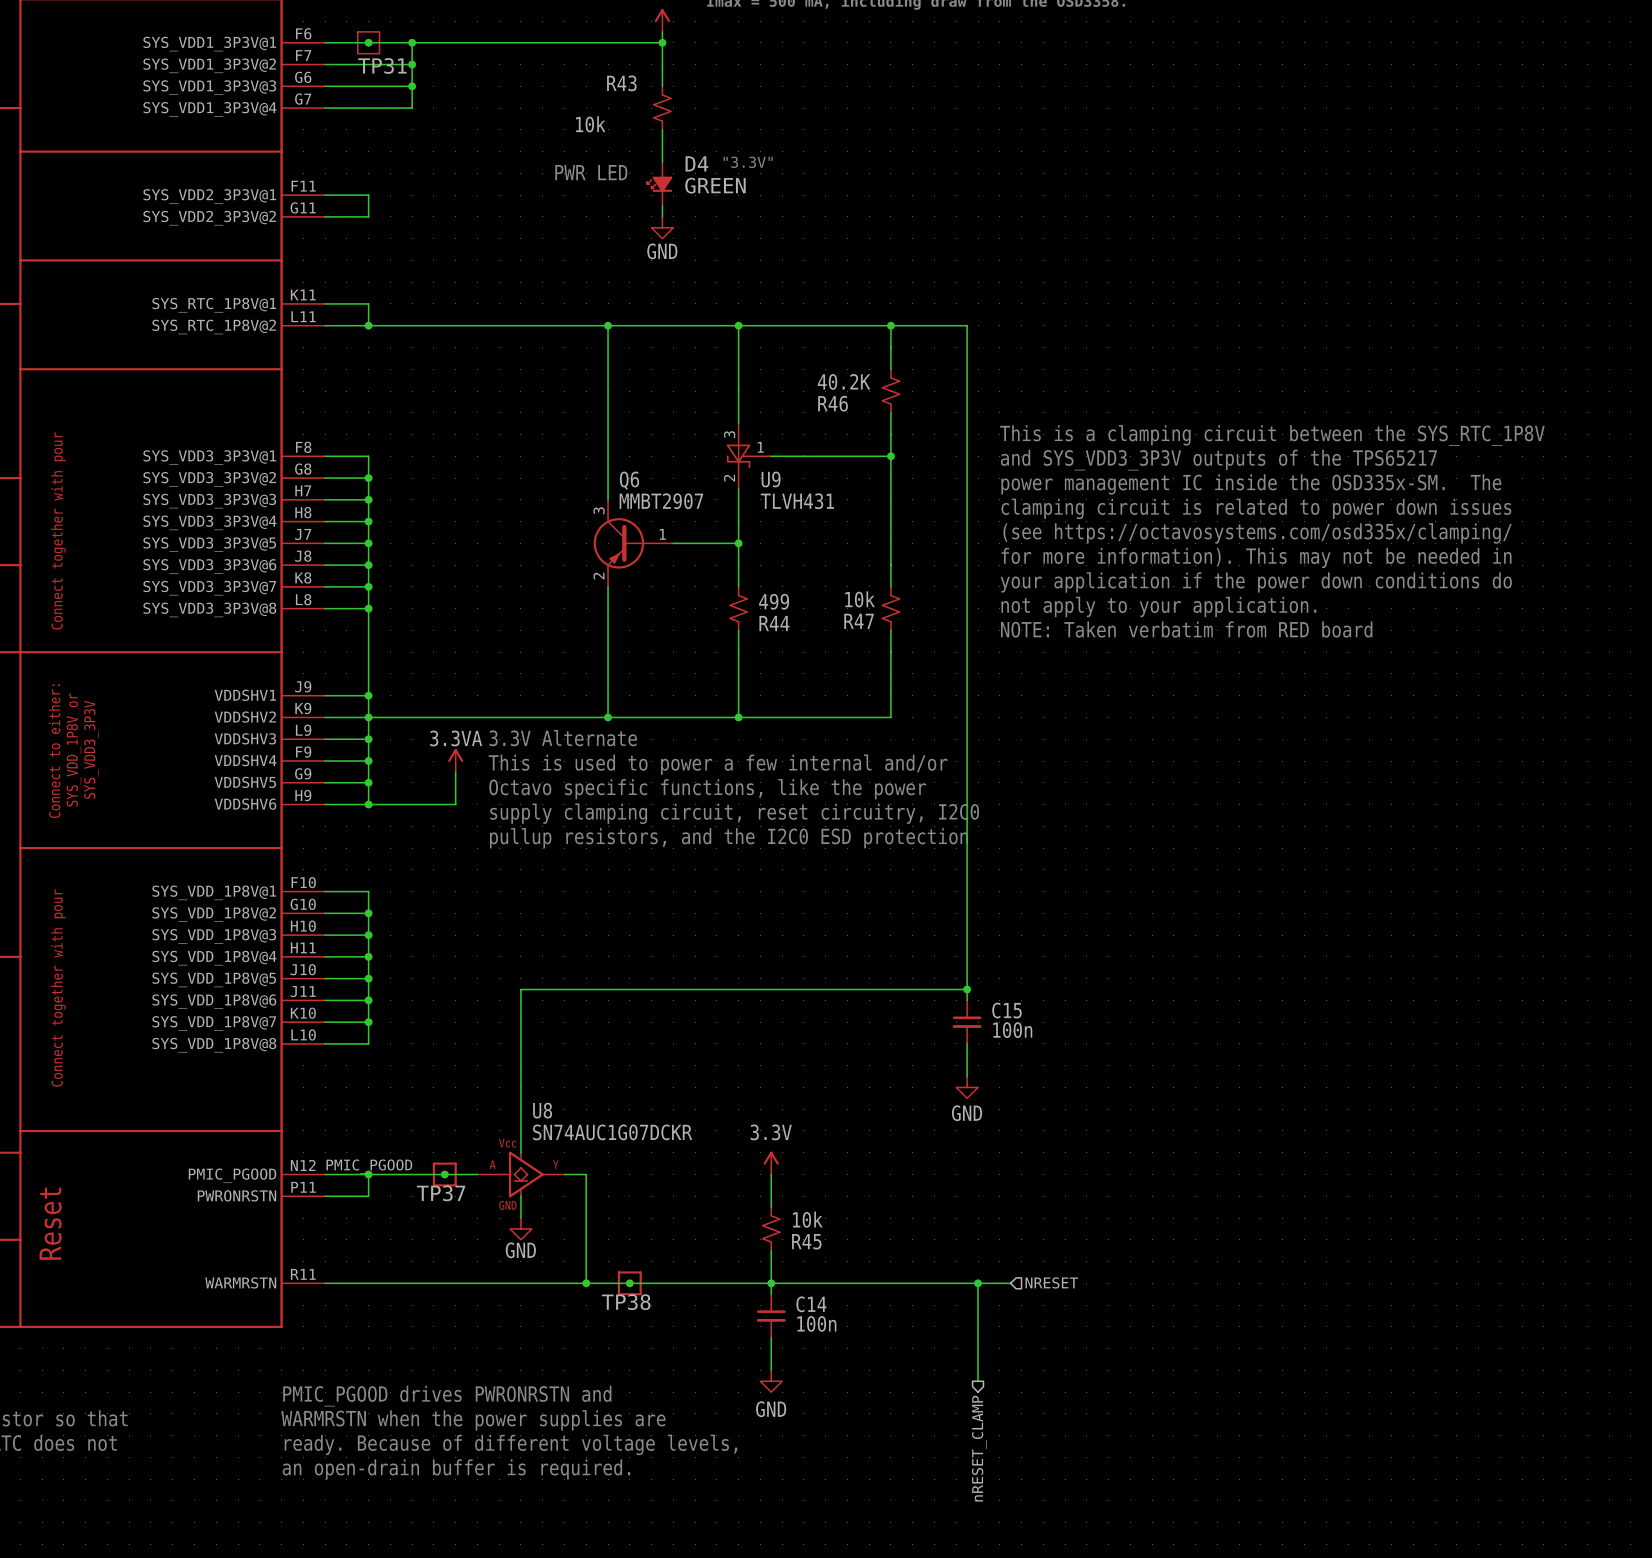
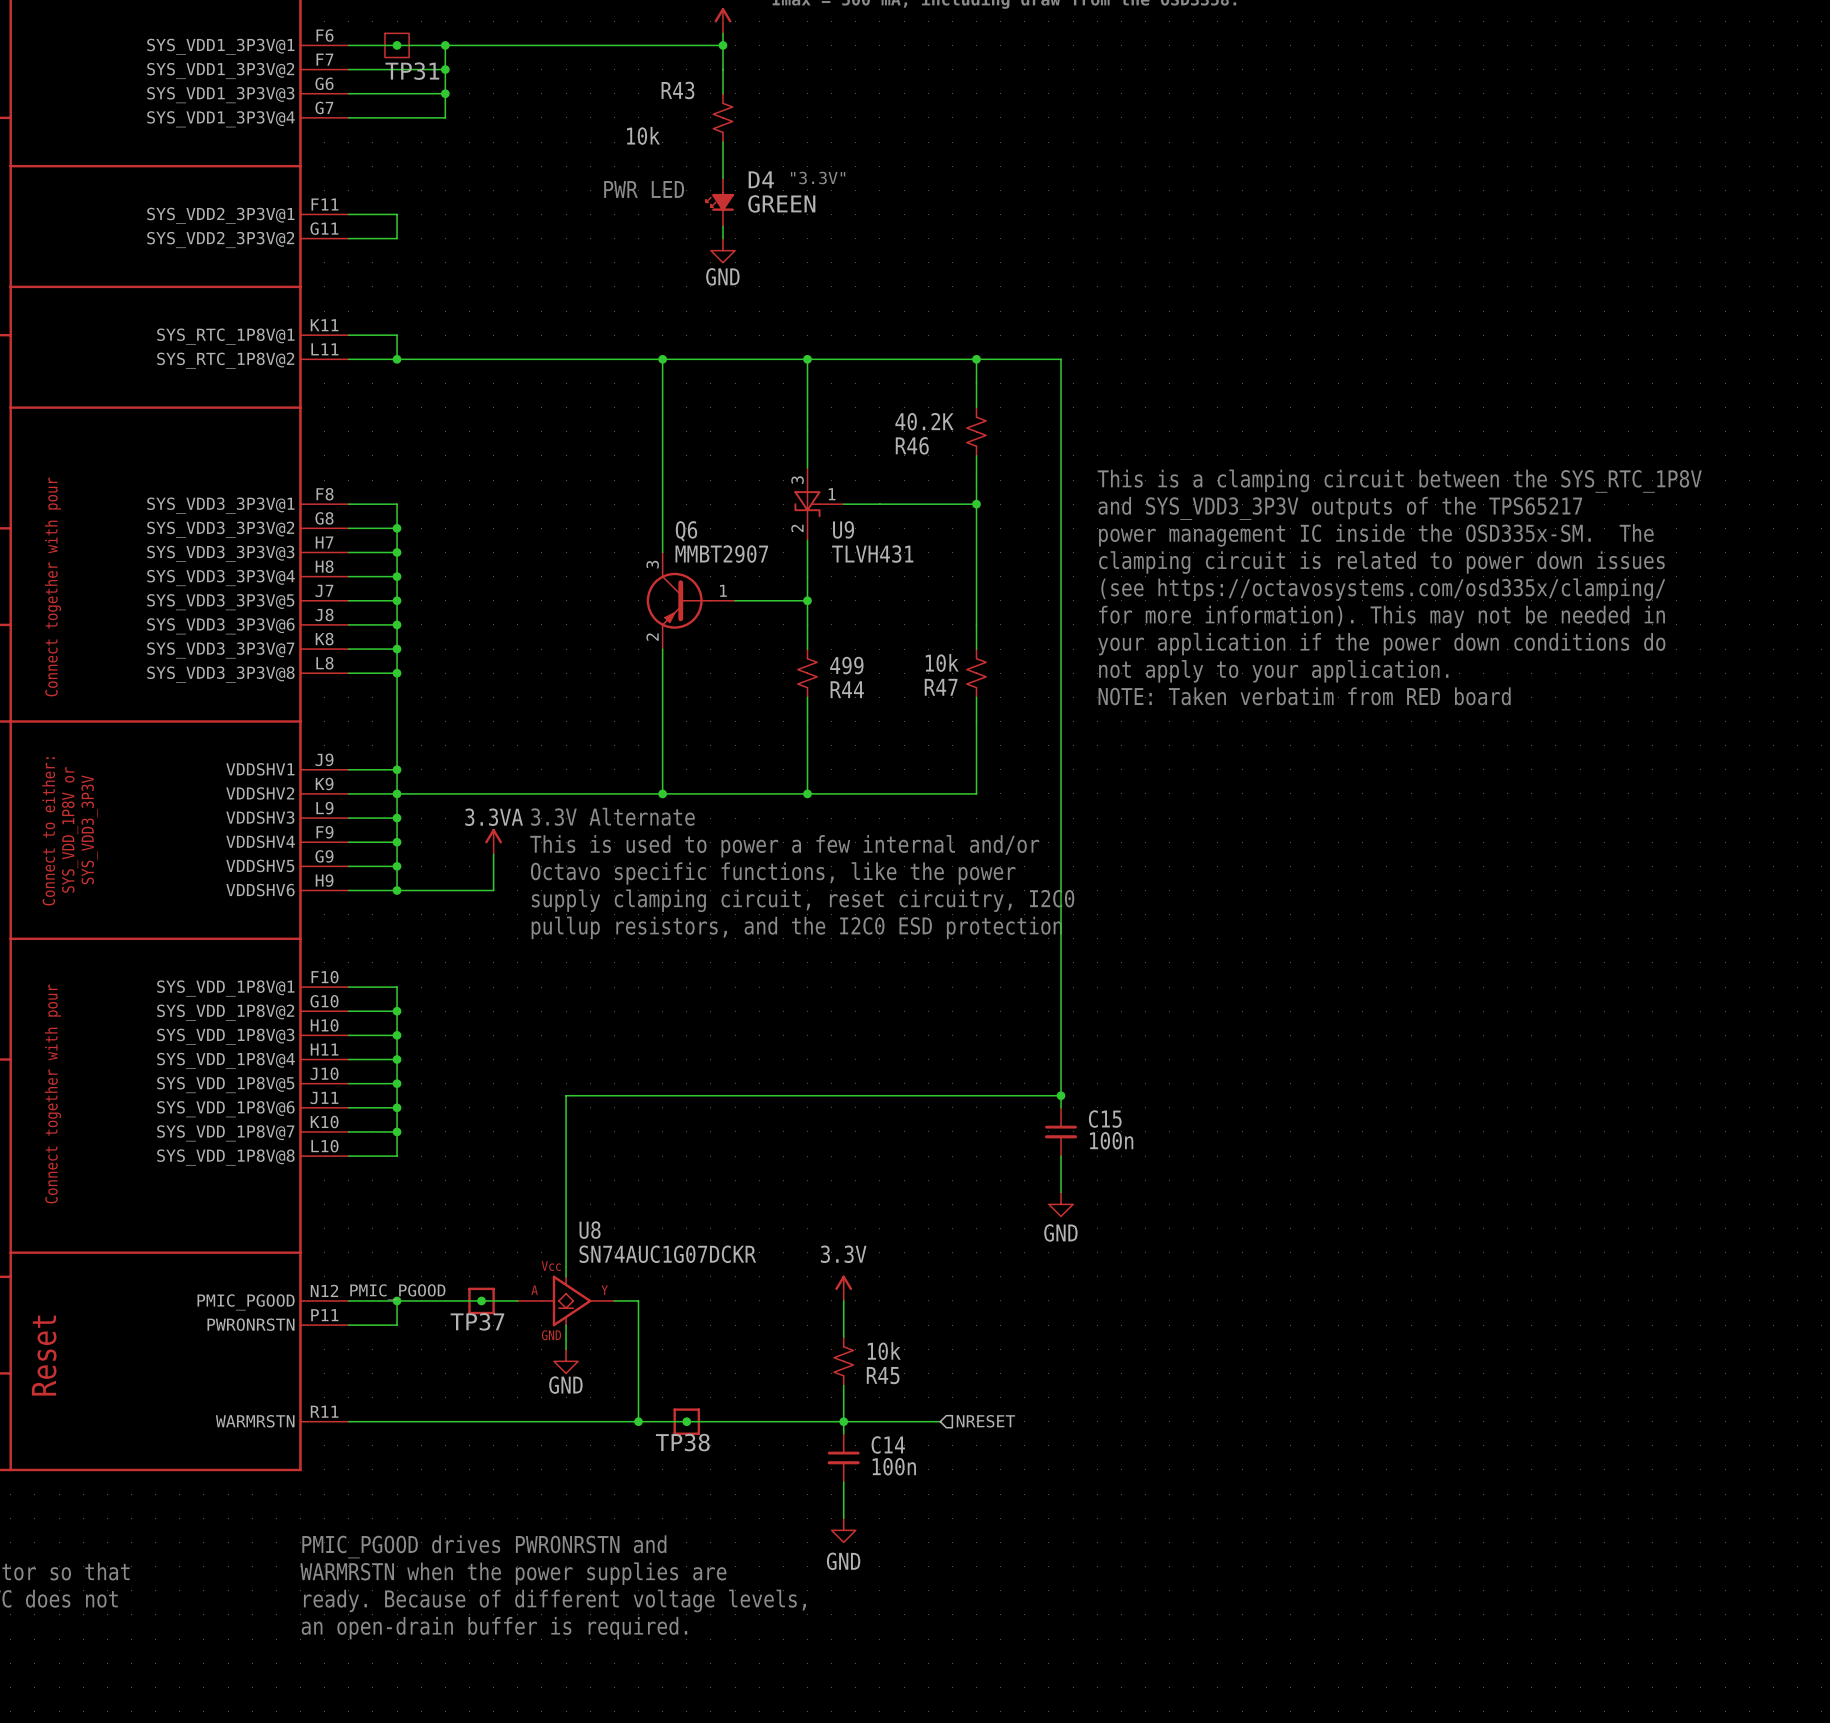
hierarchical label position: NRESET (1051, 1282) -> NRESET (985, 1421)
wire: (858, 1283) (1010, 1283) -> none
wire: (978, 1283) (978, 1381) -> none
junction: (978, 1283) -> none
hierarchical label: nRESET_CLAMP (979, 1448) -> none

